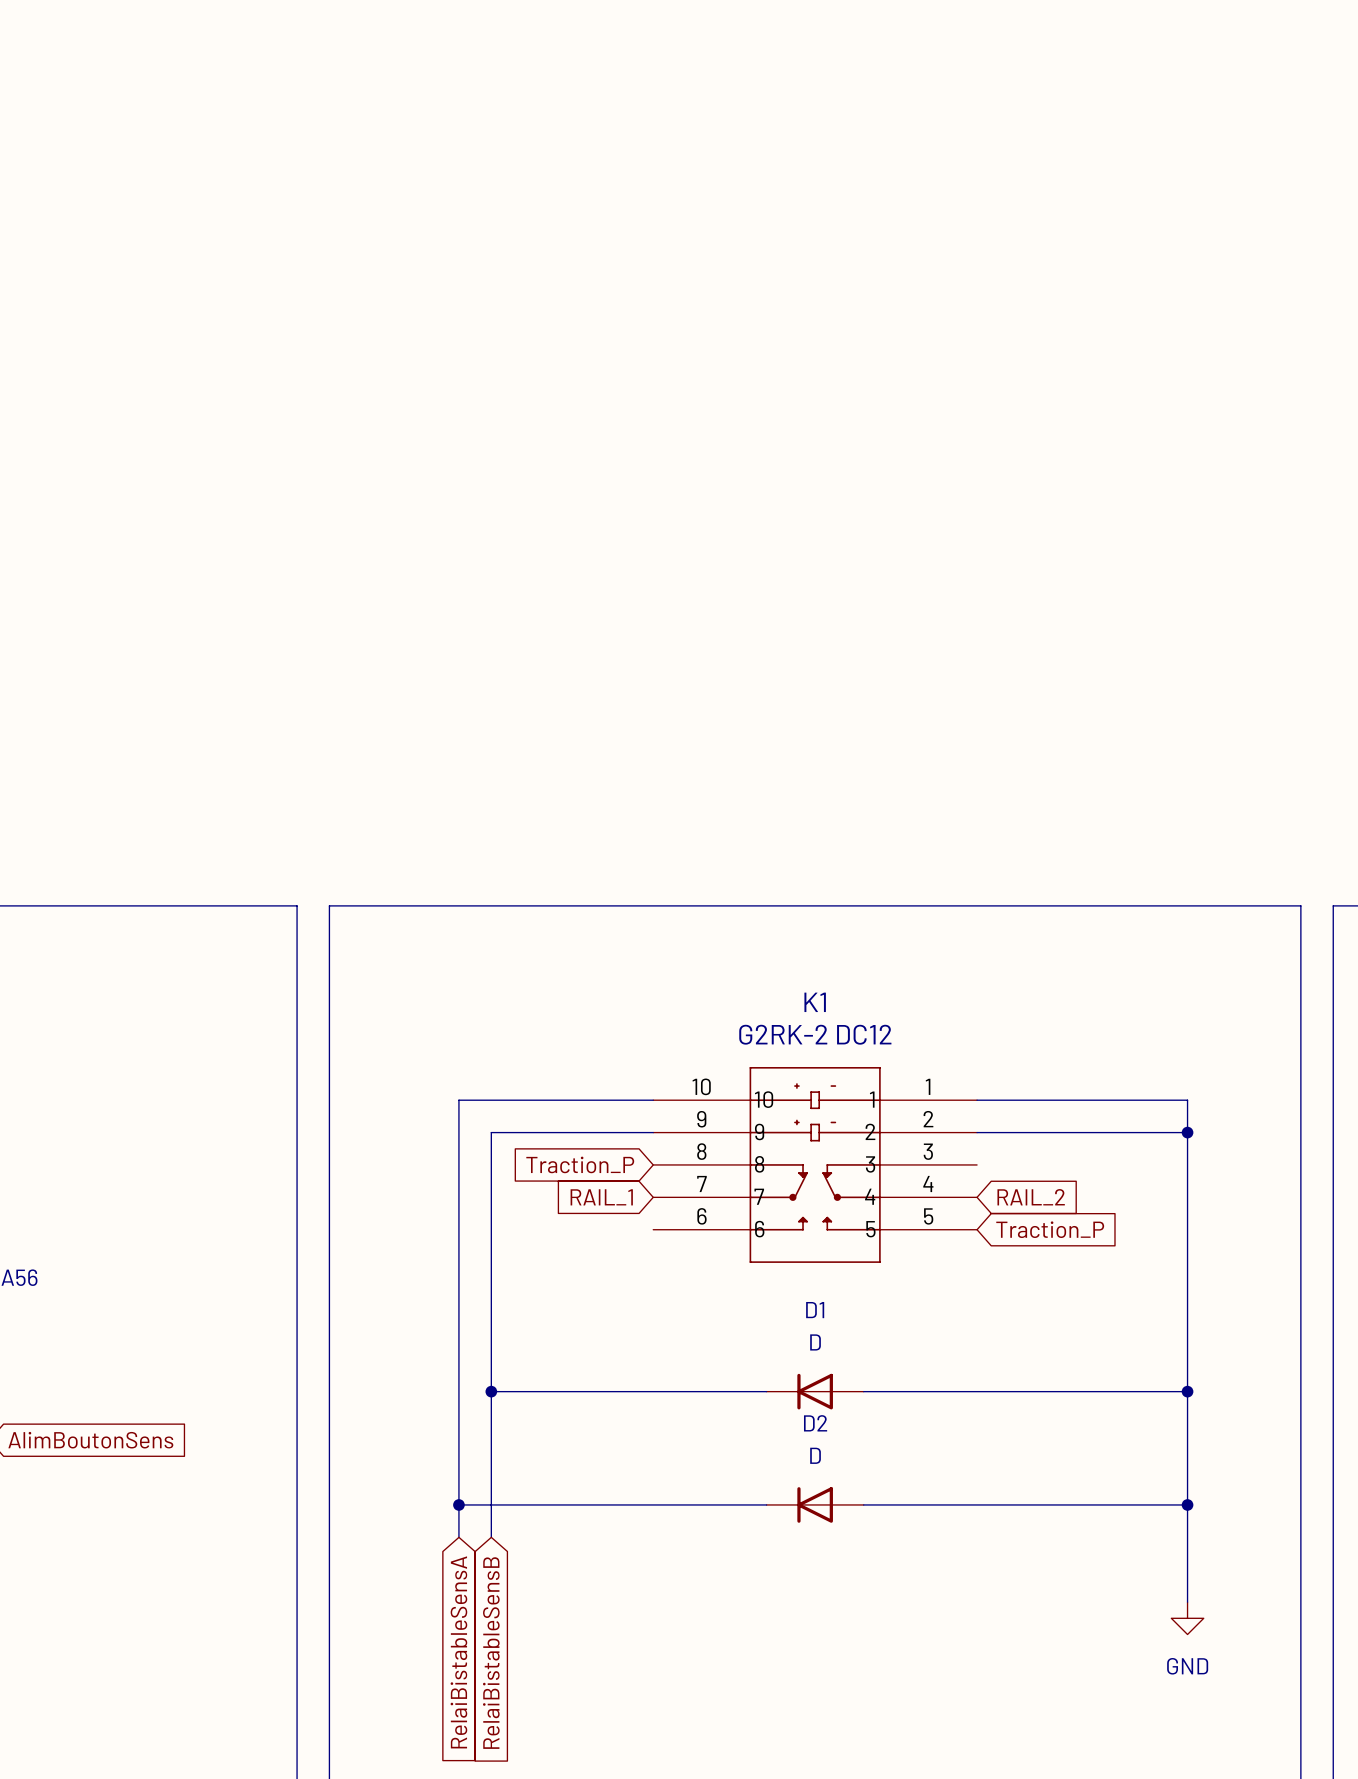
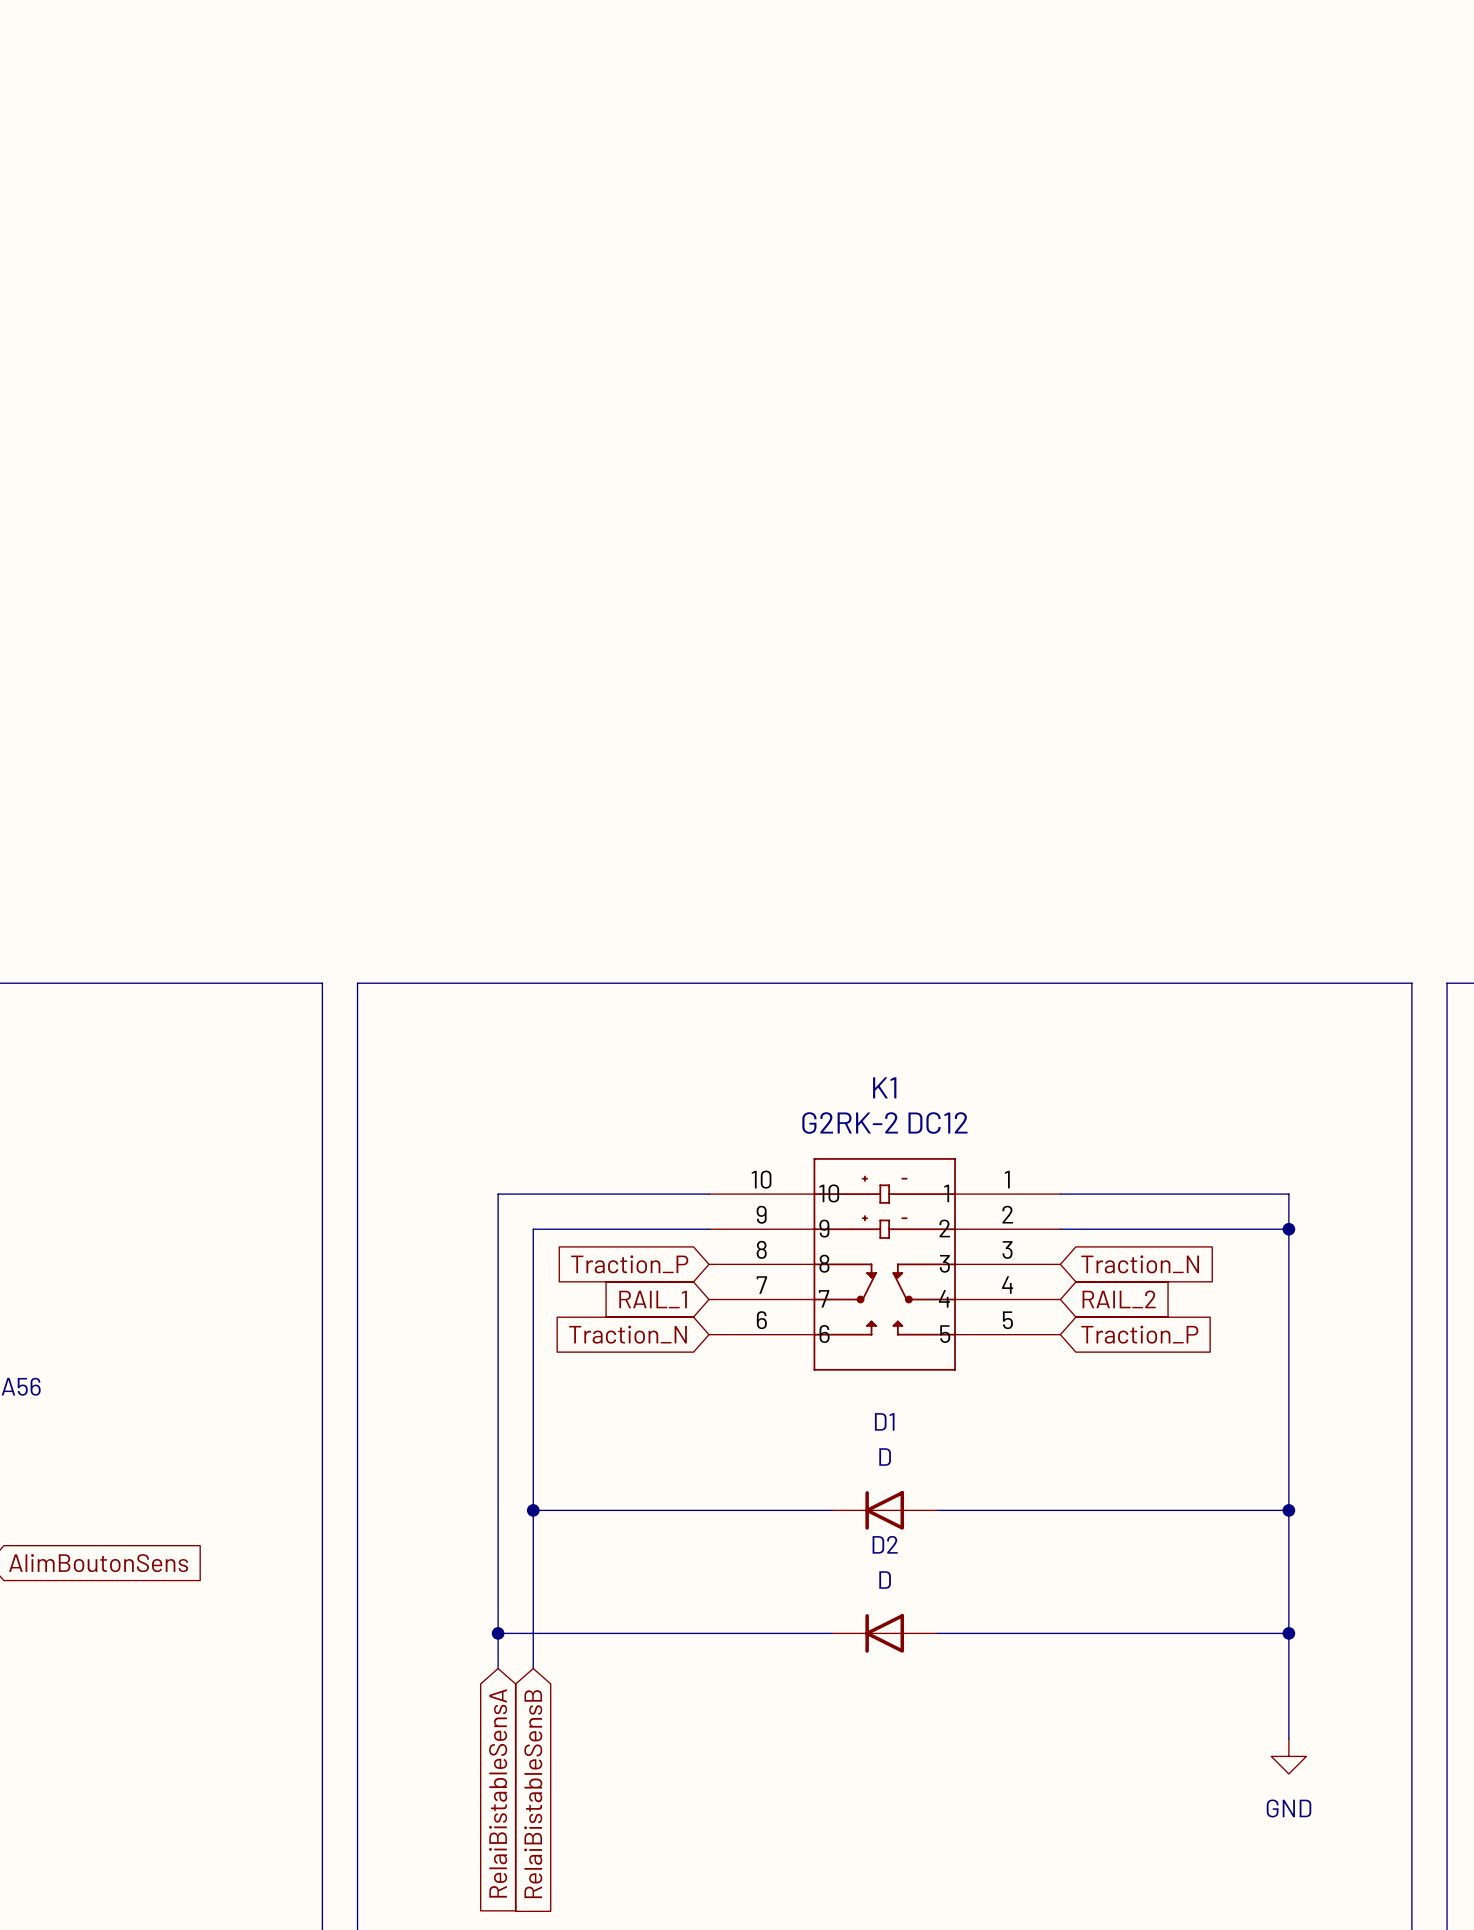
global label: none -> Traction_N (1140, 1264)
global label: none -> Traction_N (627, 1334)

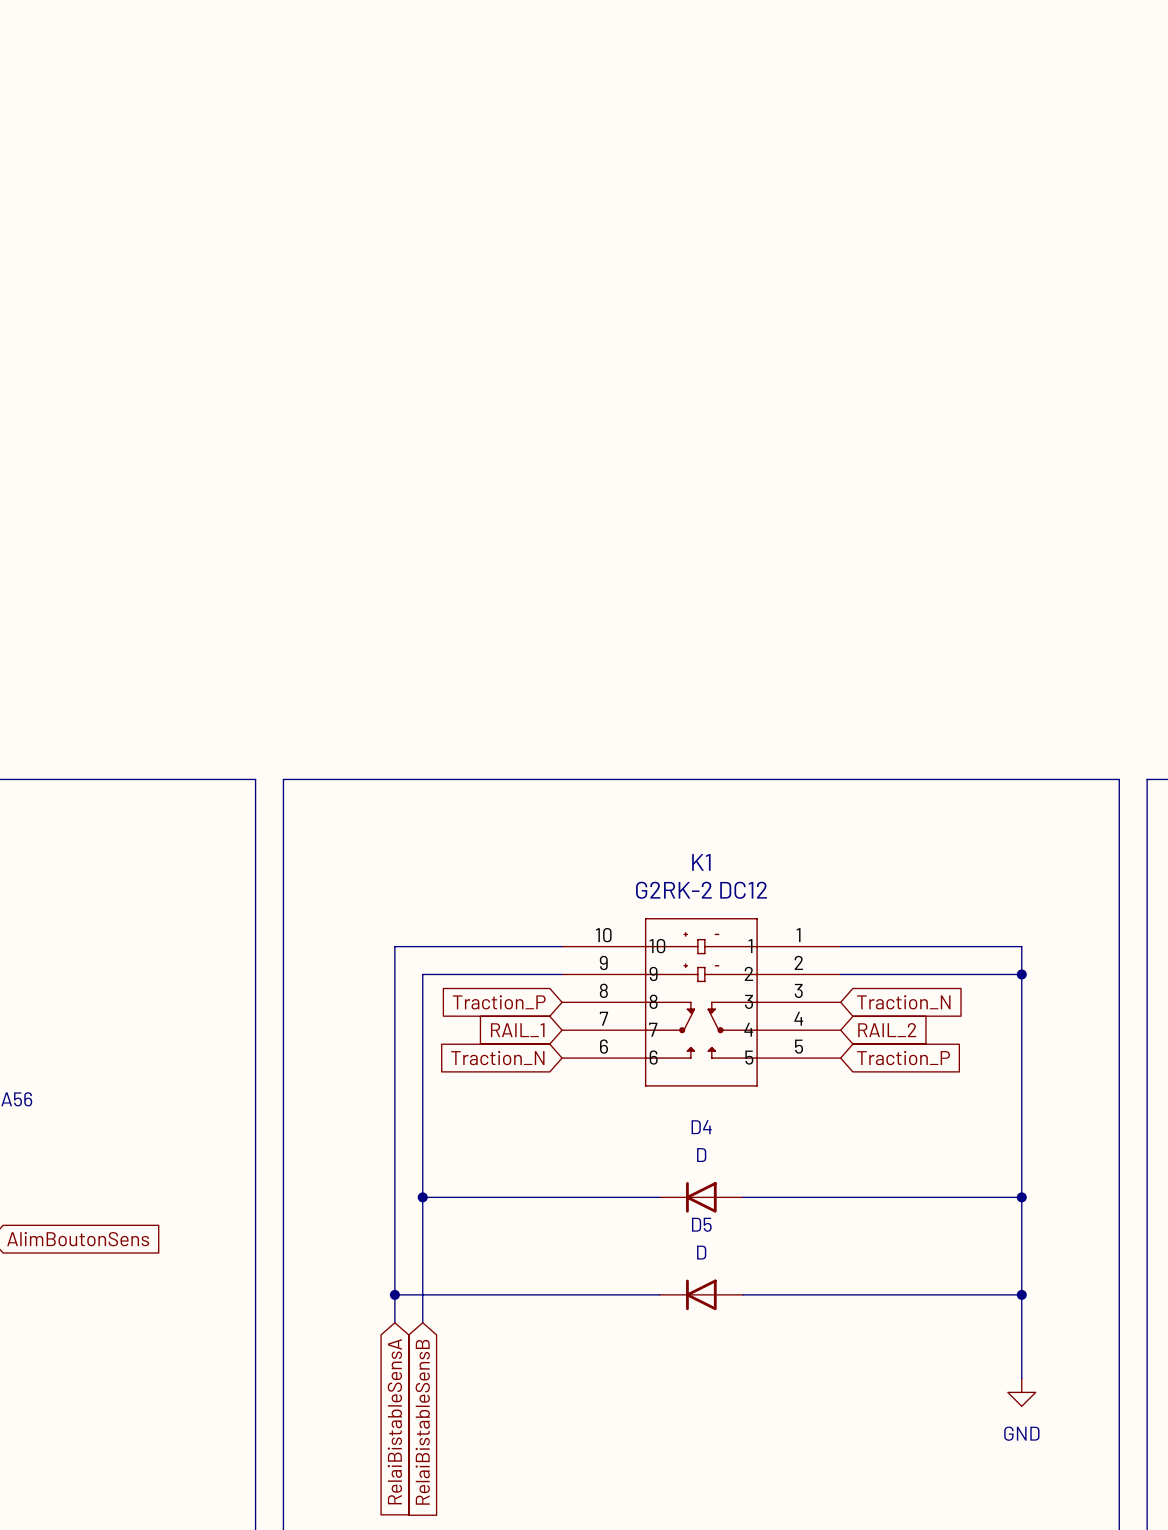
D1 name: D1 (884, 1421) -> D4 (701, 1127)
D2 name: D2 (885, 1544) -> D5 (701, 1224)

